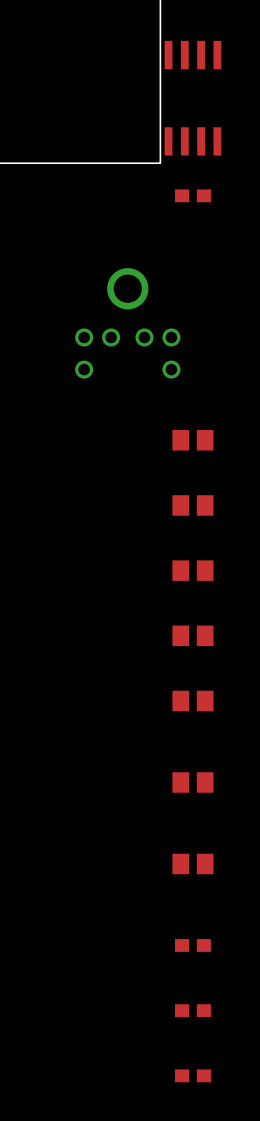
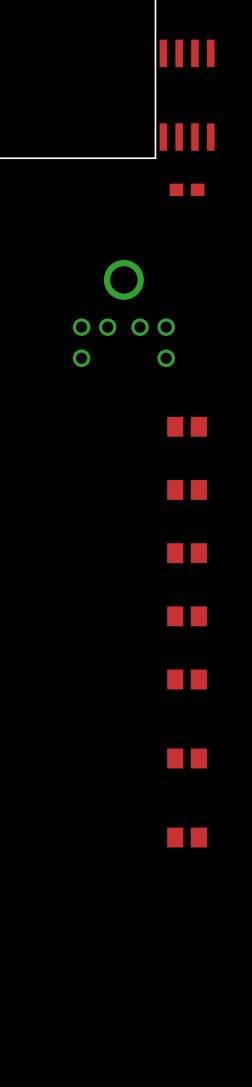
part: (192, 945) -> none
part: (192, 1010) -> none
part: (192, 1075) -> none

